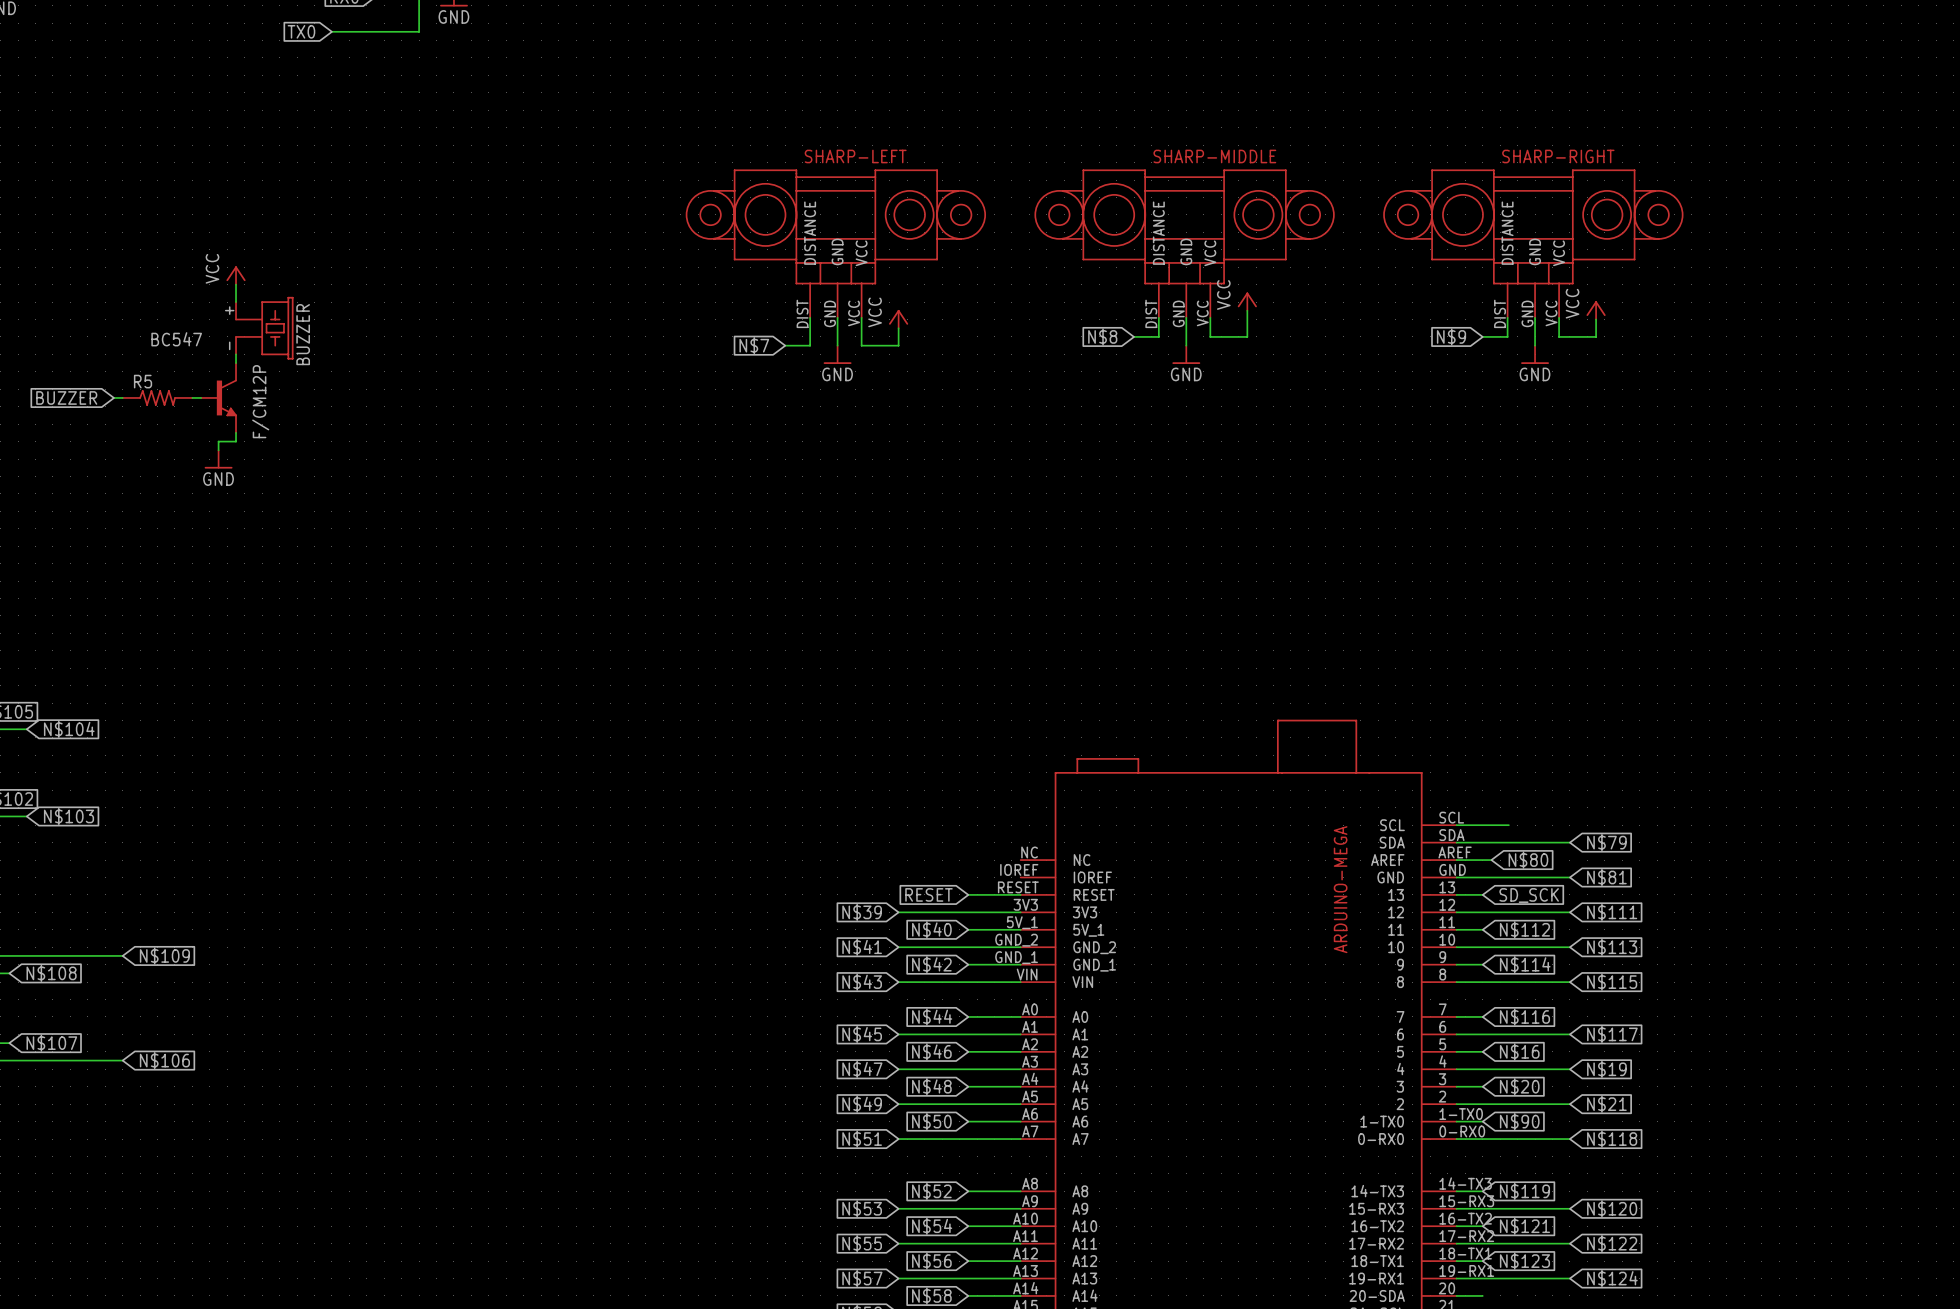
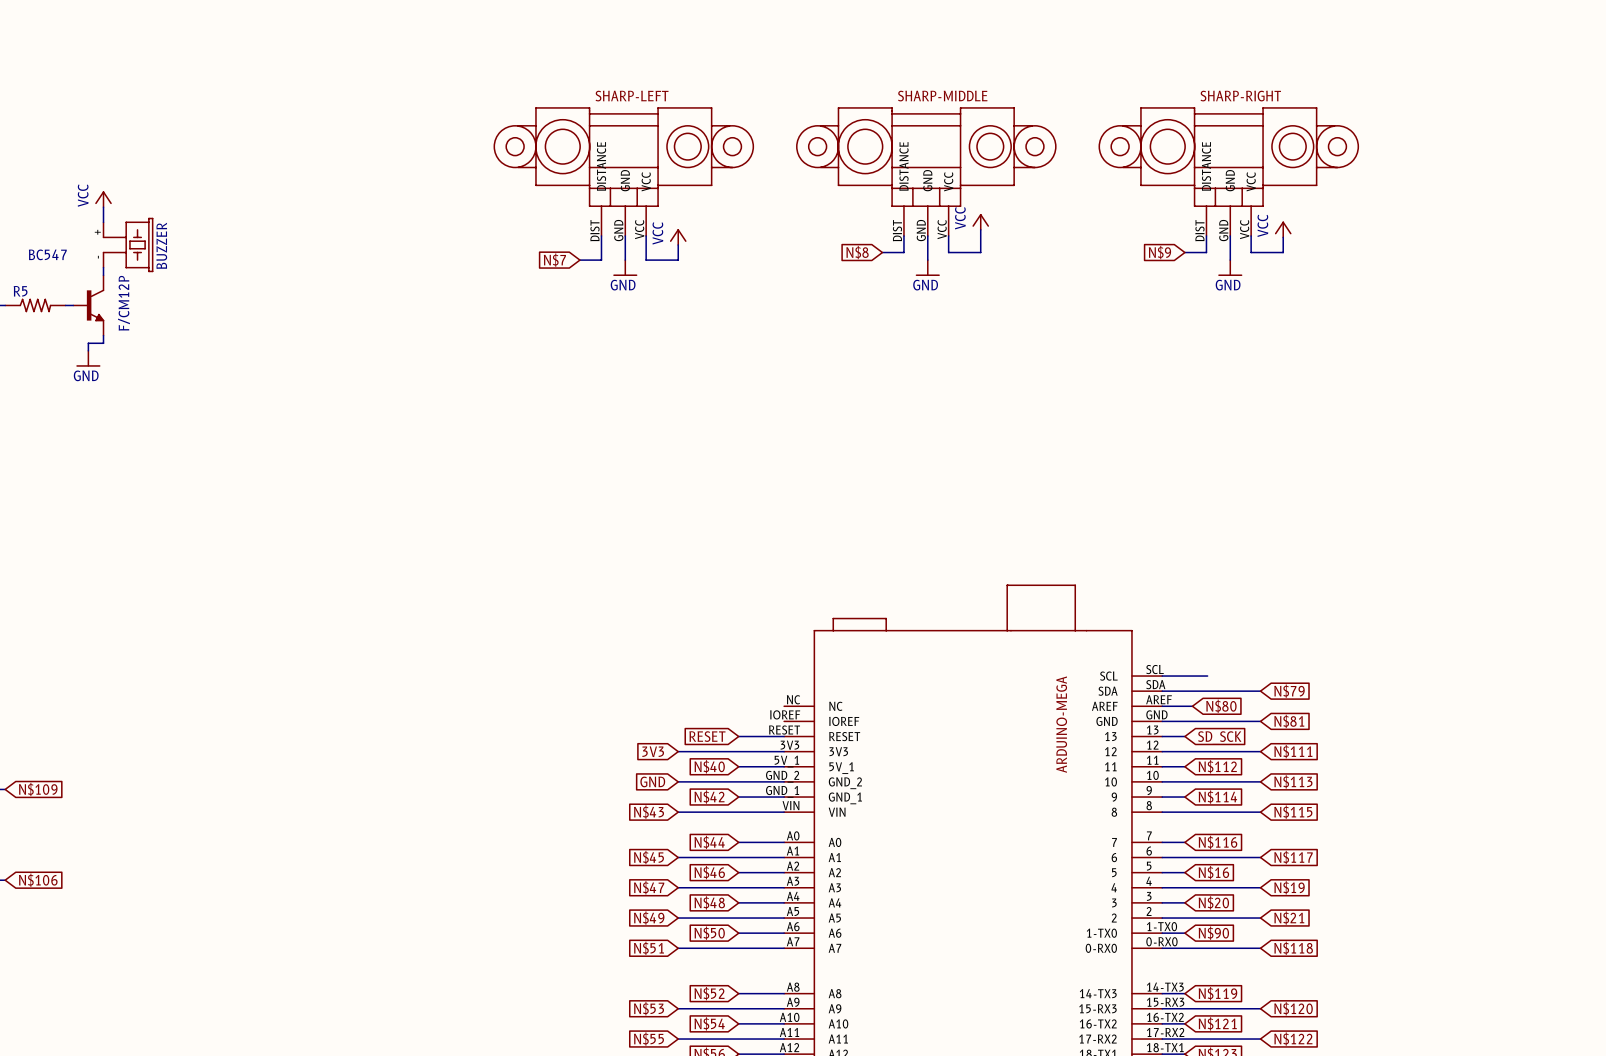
global label: N$39 (862, 912) -> 3V3 (653, 751)
global label: N$41 (862, 947) -> GND (652, 781)

